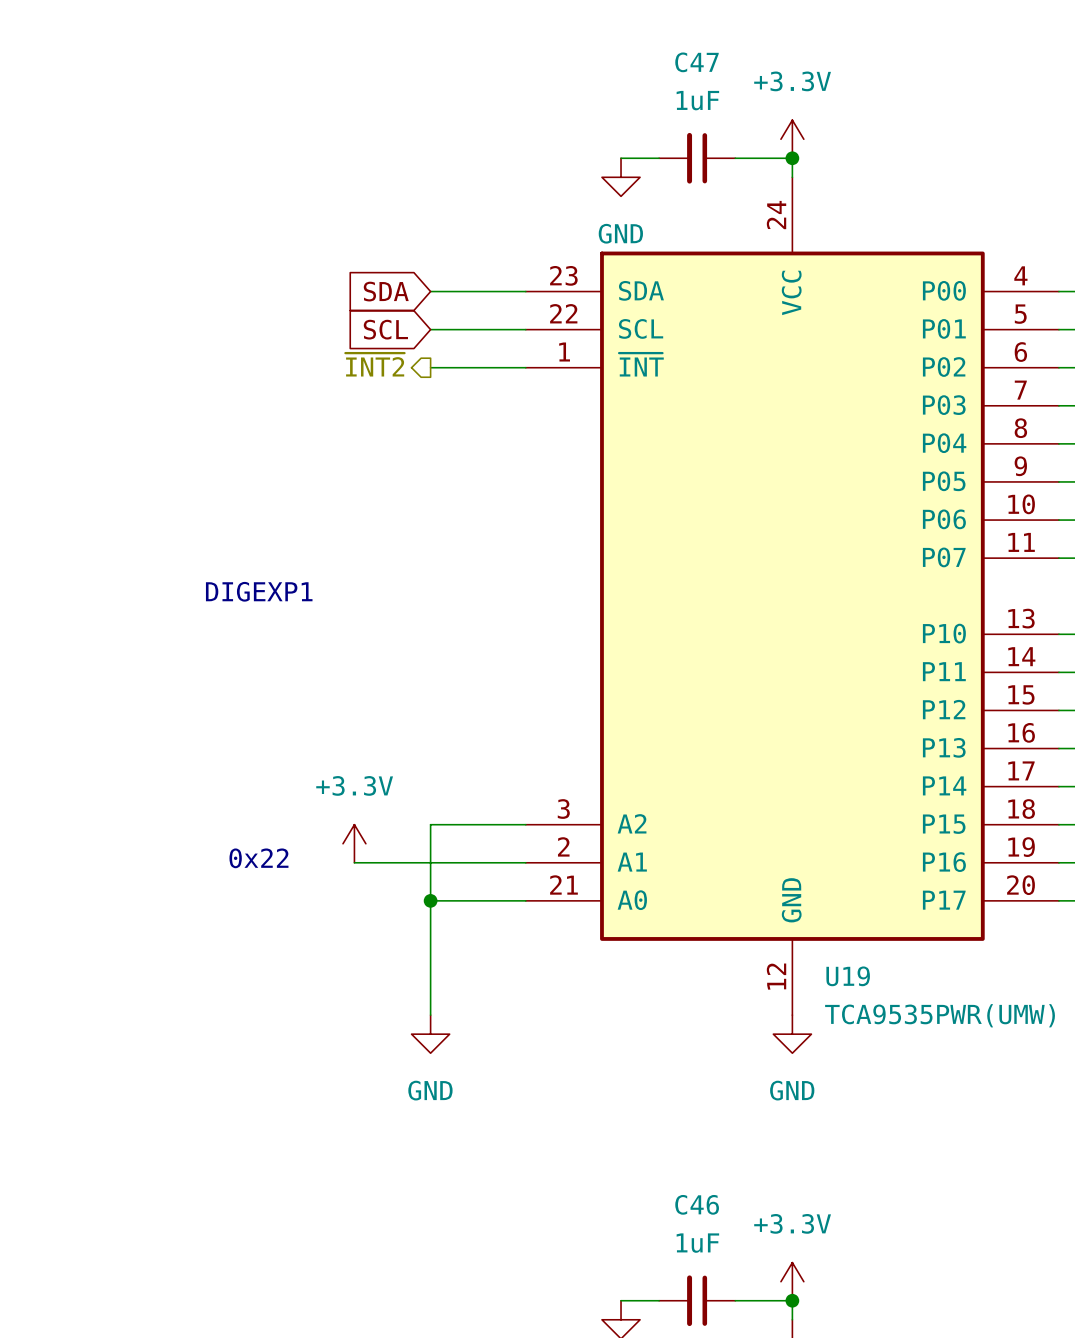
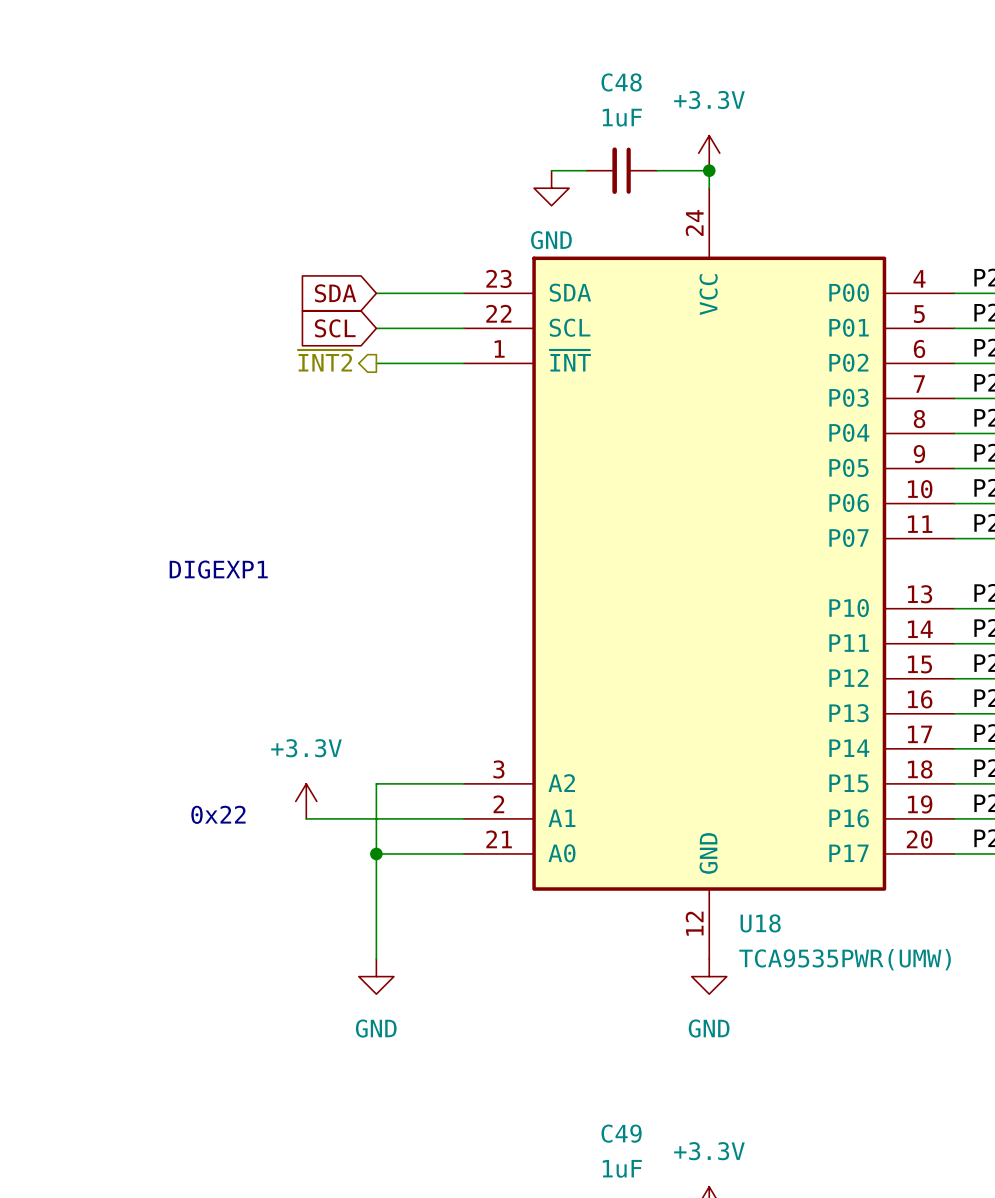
C47 name: C47 (696, 62) -> C48 (621, 82)
U19 name: U19 (848, 976) -> U18 (760, 923)
C46 name: C46 (697, 1204) -> C49 (621, 1133)

